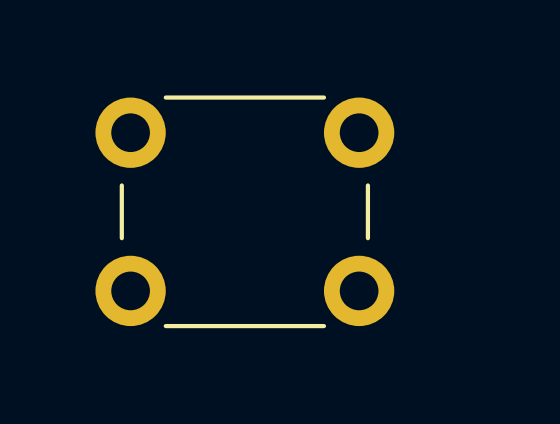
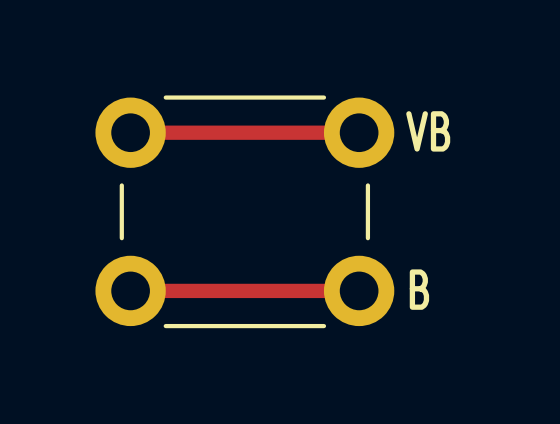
text: none -> VB (428, 131)
track: none -> (130, 132) (359, 132)
text: none -> B (419, 289)
track: none -> (130, 290) (359, 290)

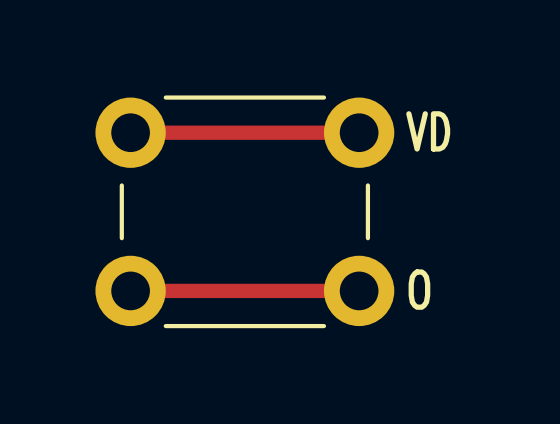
text: VB (428, 131) -> VD (428, 131)
text: B (419, 289) -> O (419, 289)

